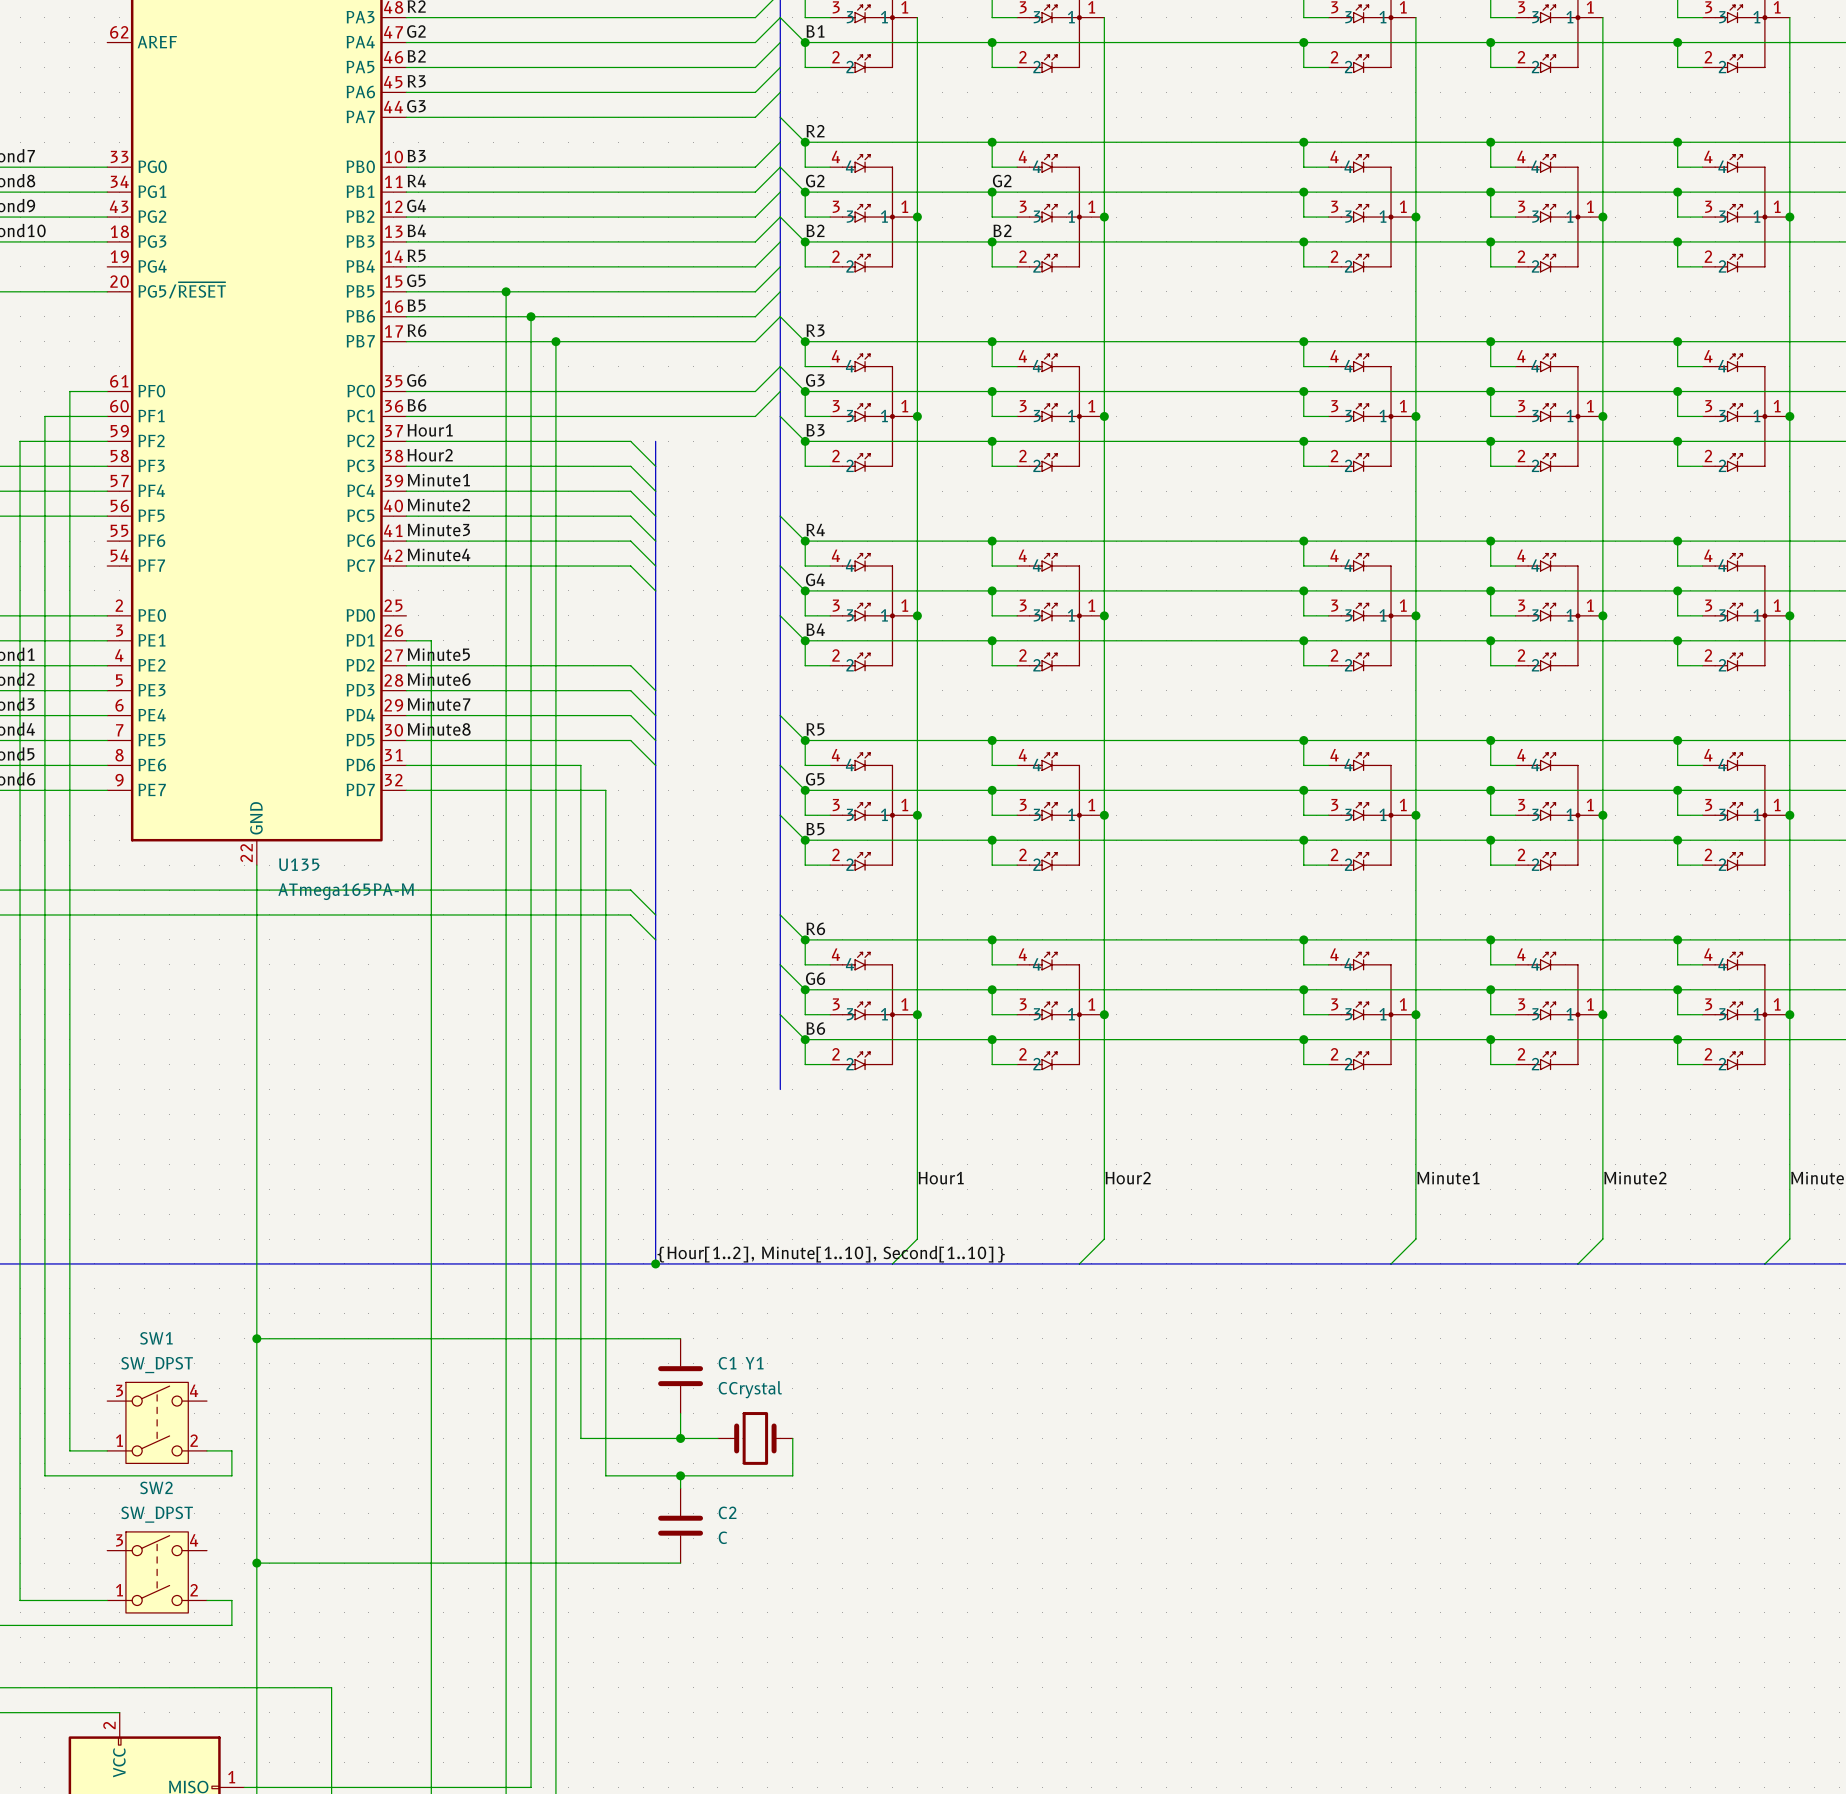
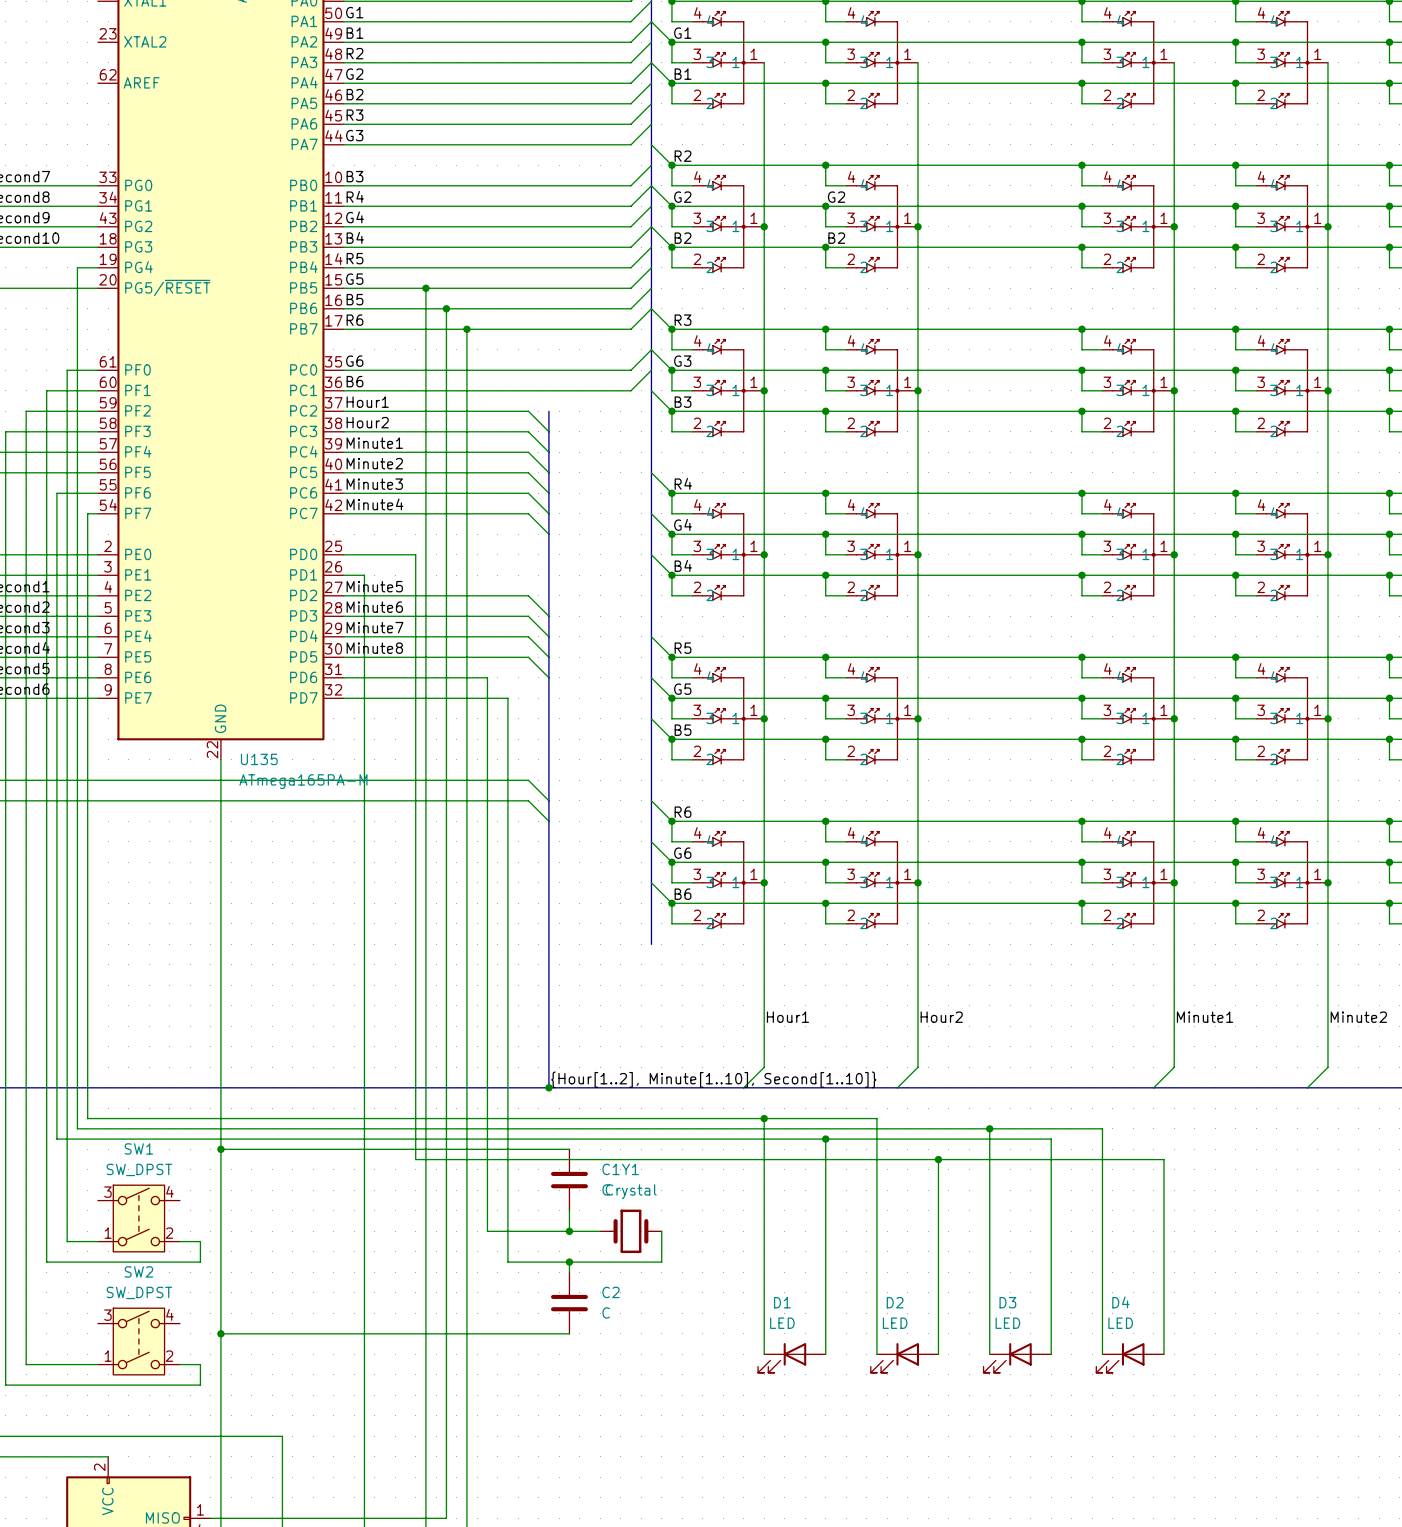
wire: none -> (97, 267) (77, 267) (77, 1128) (1102, 1128) (1102, 1354)
wire: none -> (97, 493) (56, 493) (56, 1139) (1051, 1139) (1051, 1354)
wire: none -> (97, 513) (87, 513) (87, 1118) (876, 1118) (876, 1354)
wire: none -> (343, 554) (415, 554) (415, 1159) (1163, 1159) (1163, 1354)
wire: none -> (764, 1118) (764, 1354)
junction: none -> (764, 1118)
wire: none -> (989, 1128) (989, 1354)
junction: none -> (989, 1128)
wire: none -> (825, 1139) (825, 1354)
junction: none -> (825, 1139)
wire: none -> (938, 1159) (938, 1354)
junction: none -> (938, 1159)
D1: none -> LED (791, 1357)
D2: none -> LED (904, 1357)
D3: none -> LED (1017, 1357)
D4: none -> LED (1130, 1357)

